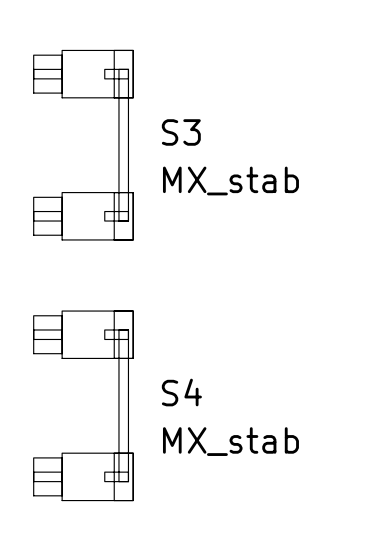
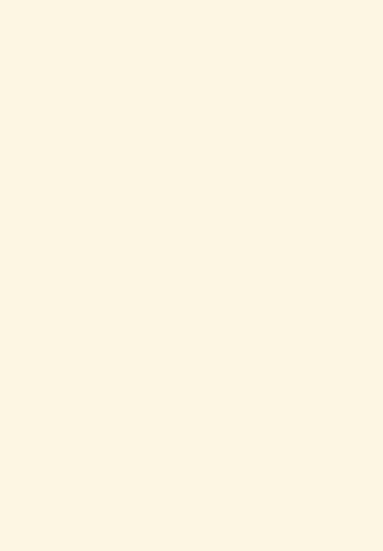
S3: MX_stab (83, 145) -> none
S4: MX_stab (83, 405) -> none

